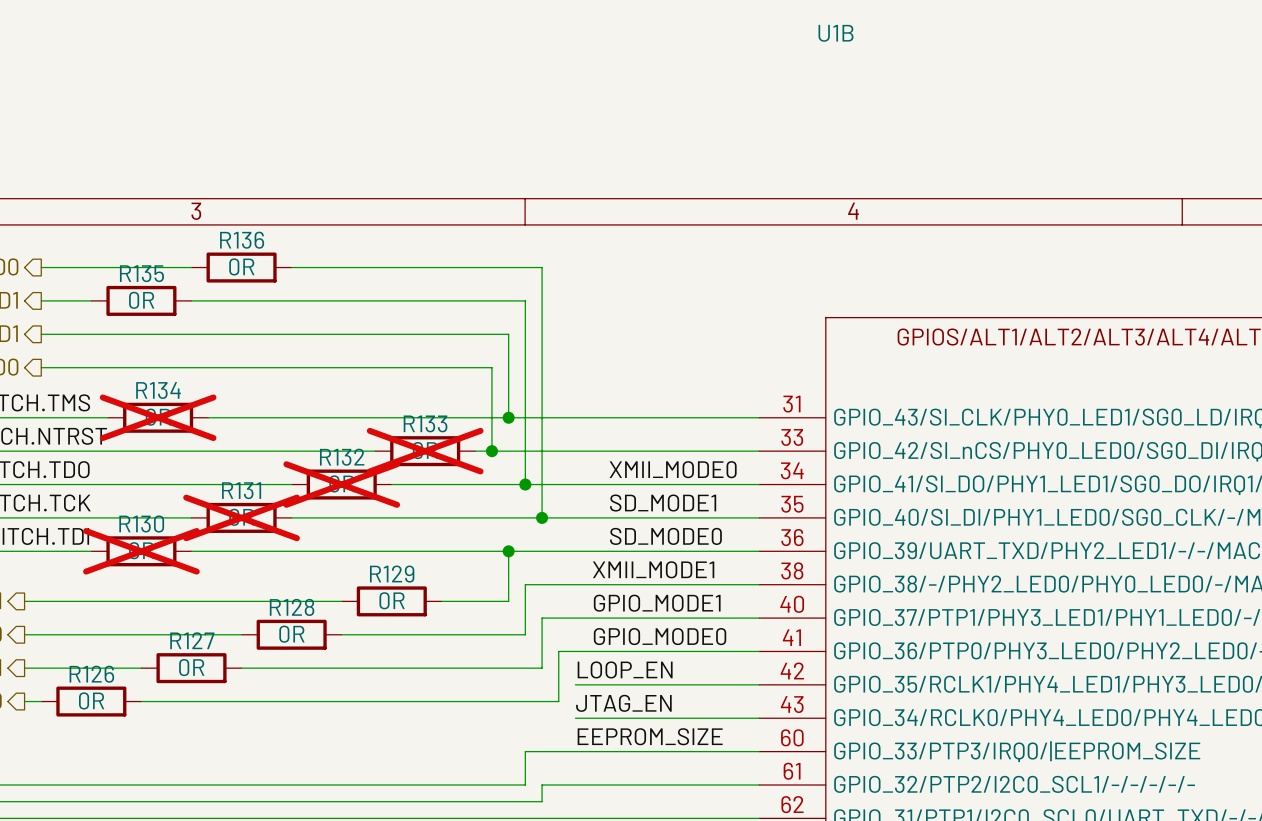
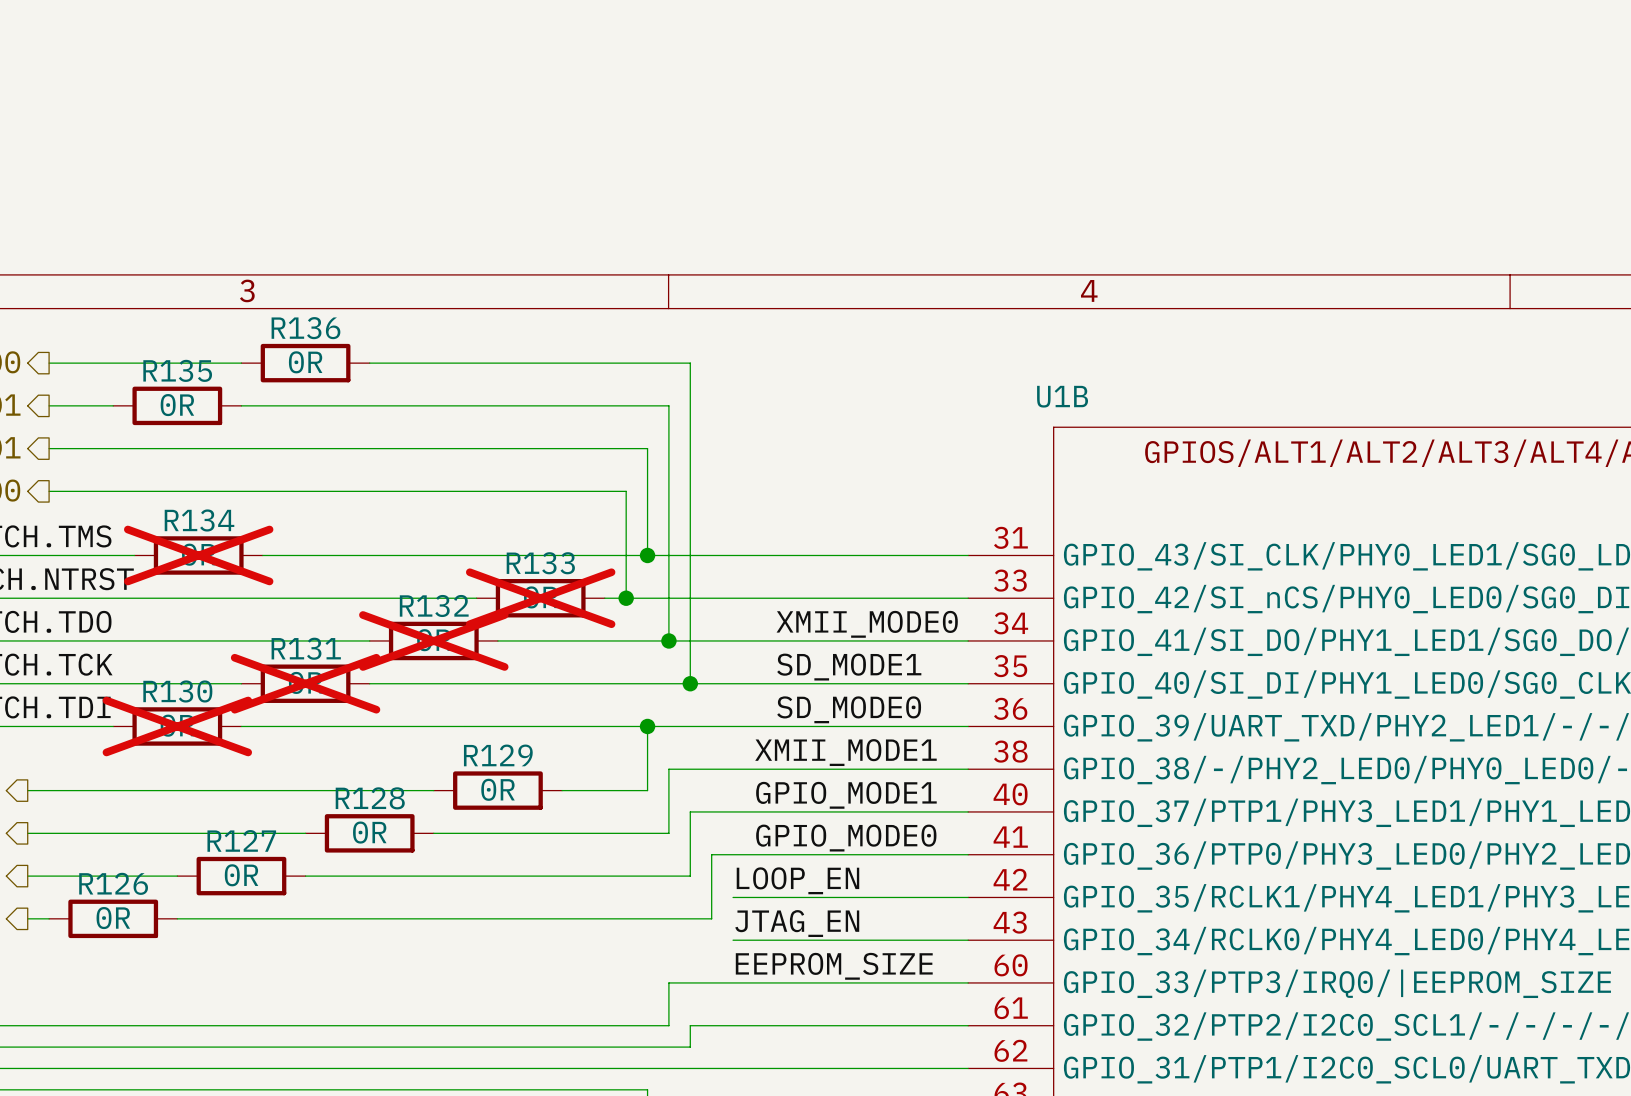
U1B name position: U1B (835, 33) -> U1B (1062, 396)

